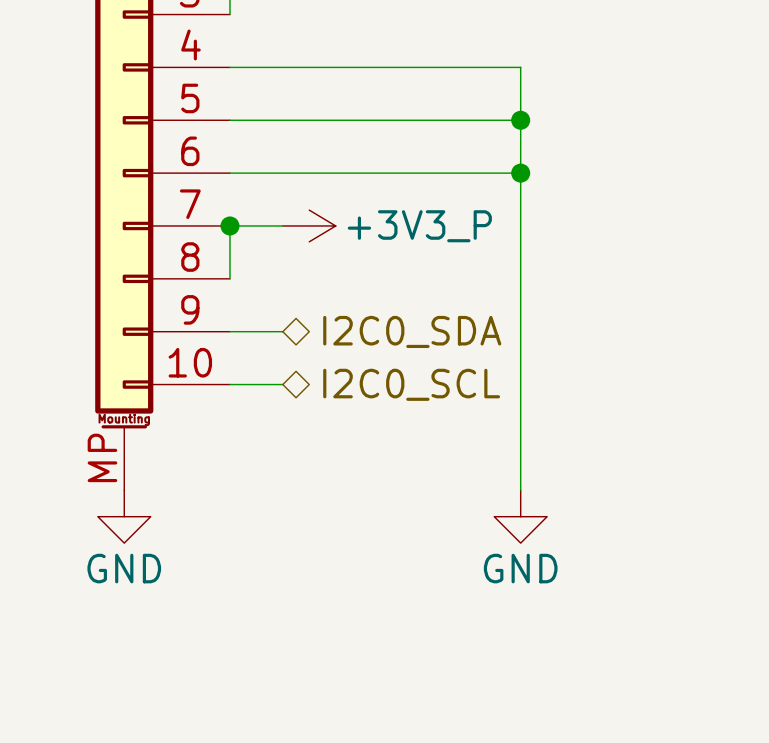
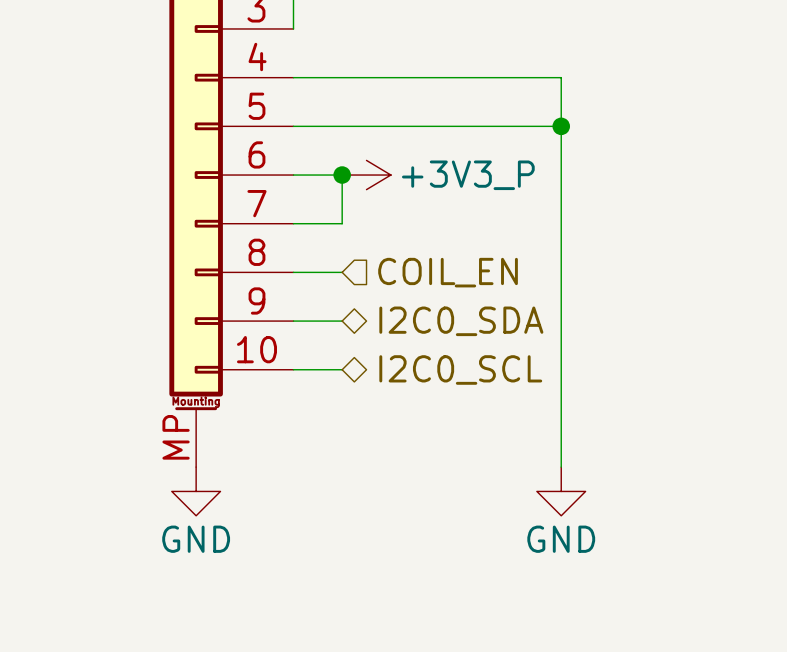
wire: (282, 173) (520, 173) -> (342, 175) (342, 223)
junction: (520, 173) -> none
wire: (229, 225) (229, 278) -> (342, 272) (293, 272)
junction position: (229, 225) -> (342, 175)
power symbol position: +3V3_P (309, 225) -> +3V3_P (366, 175)
hierarchical label: none -> COIL_EN (448, 272)

